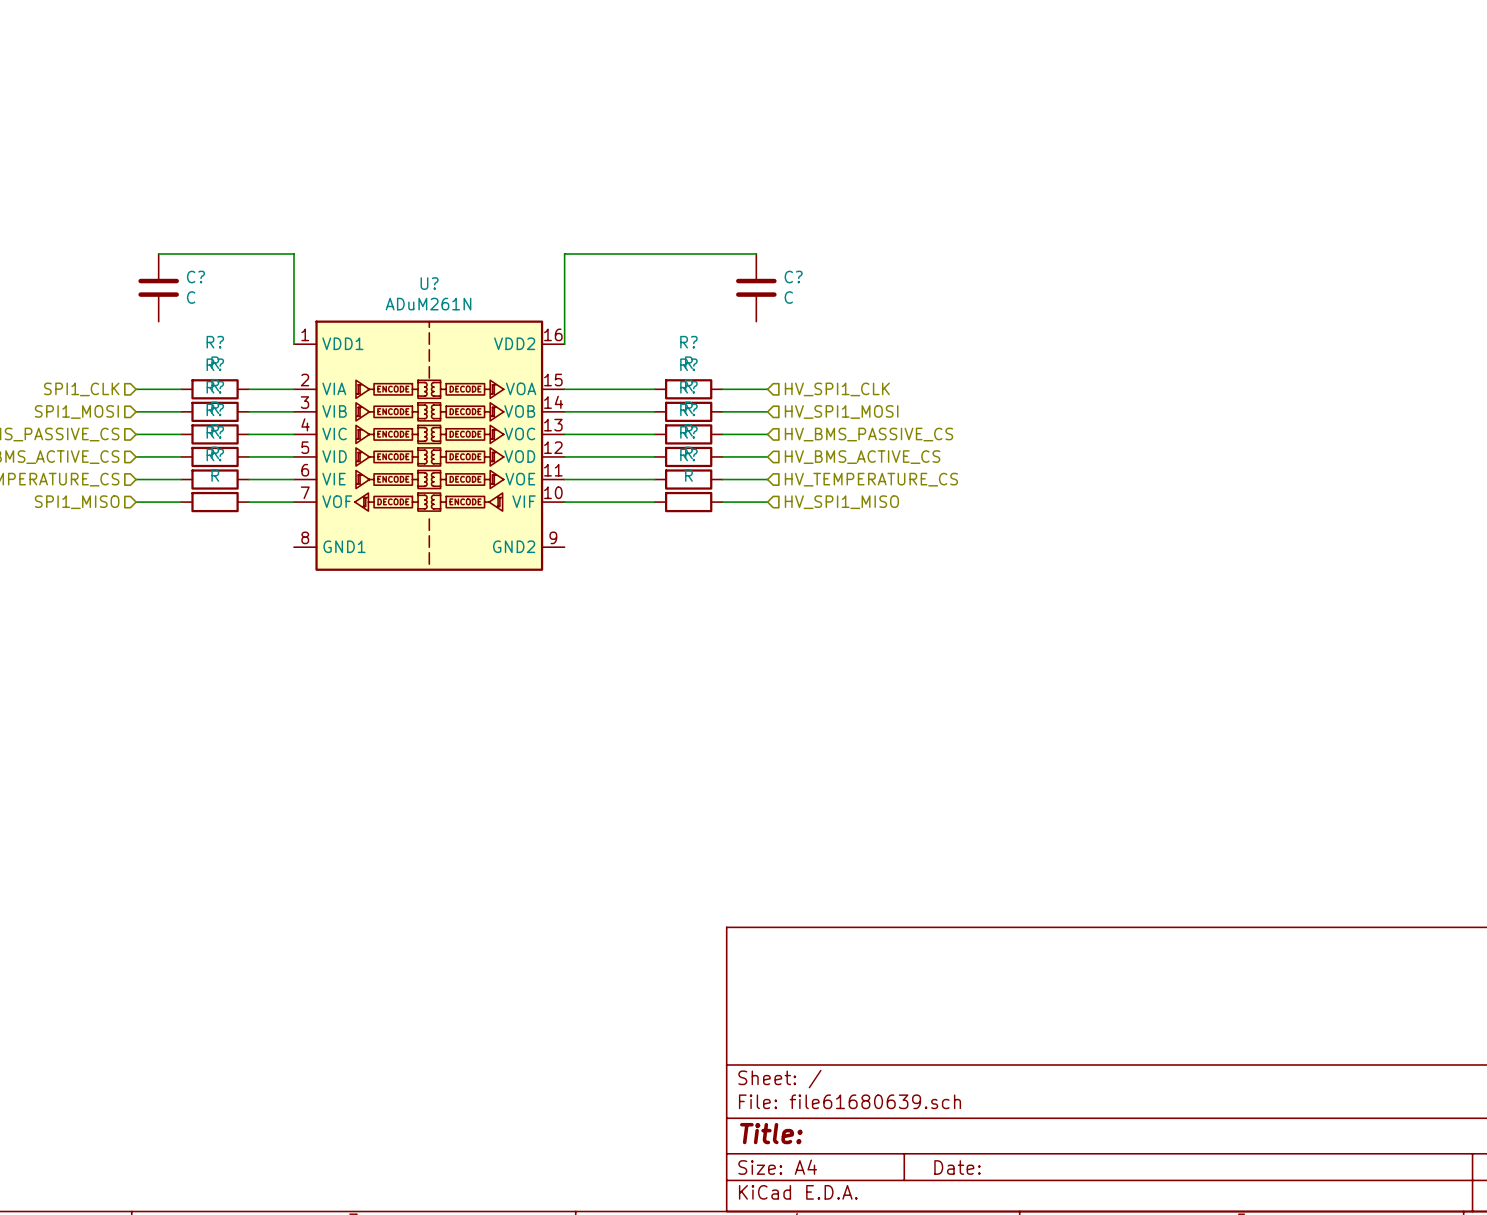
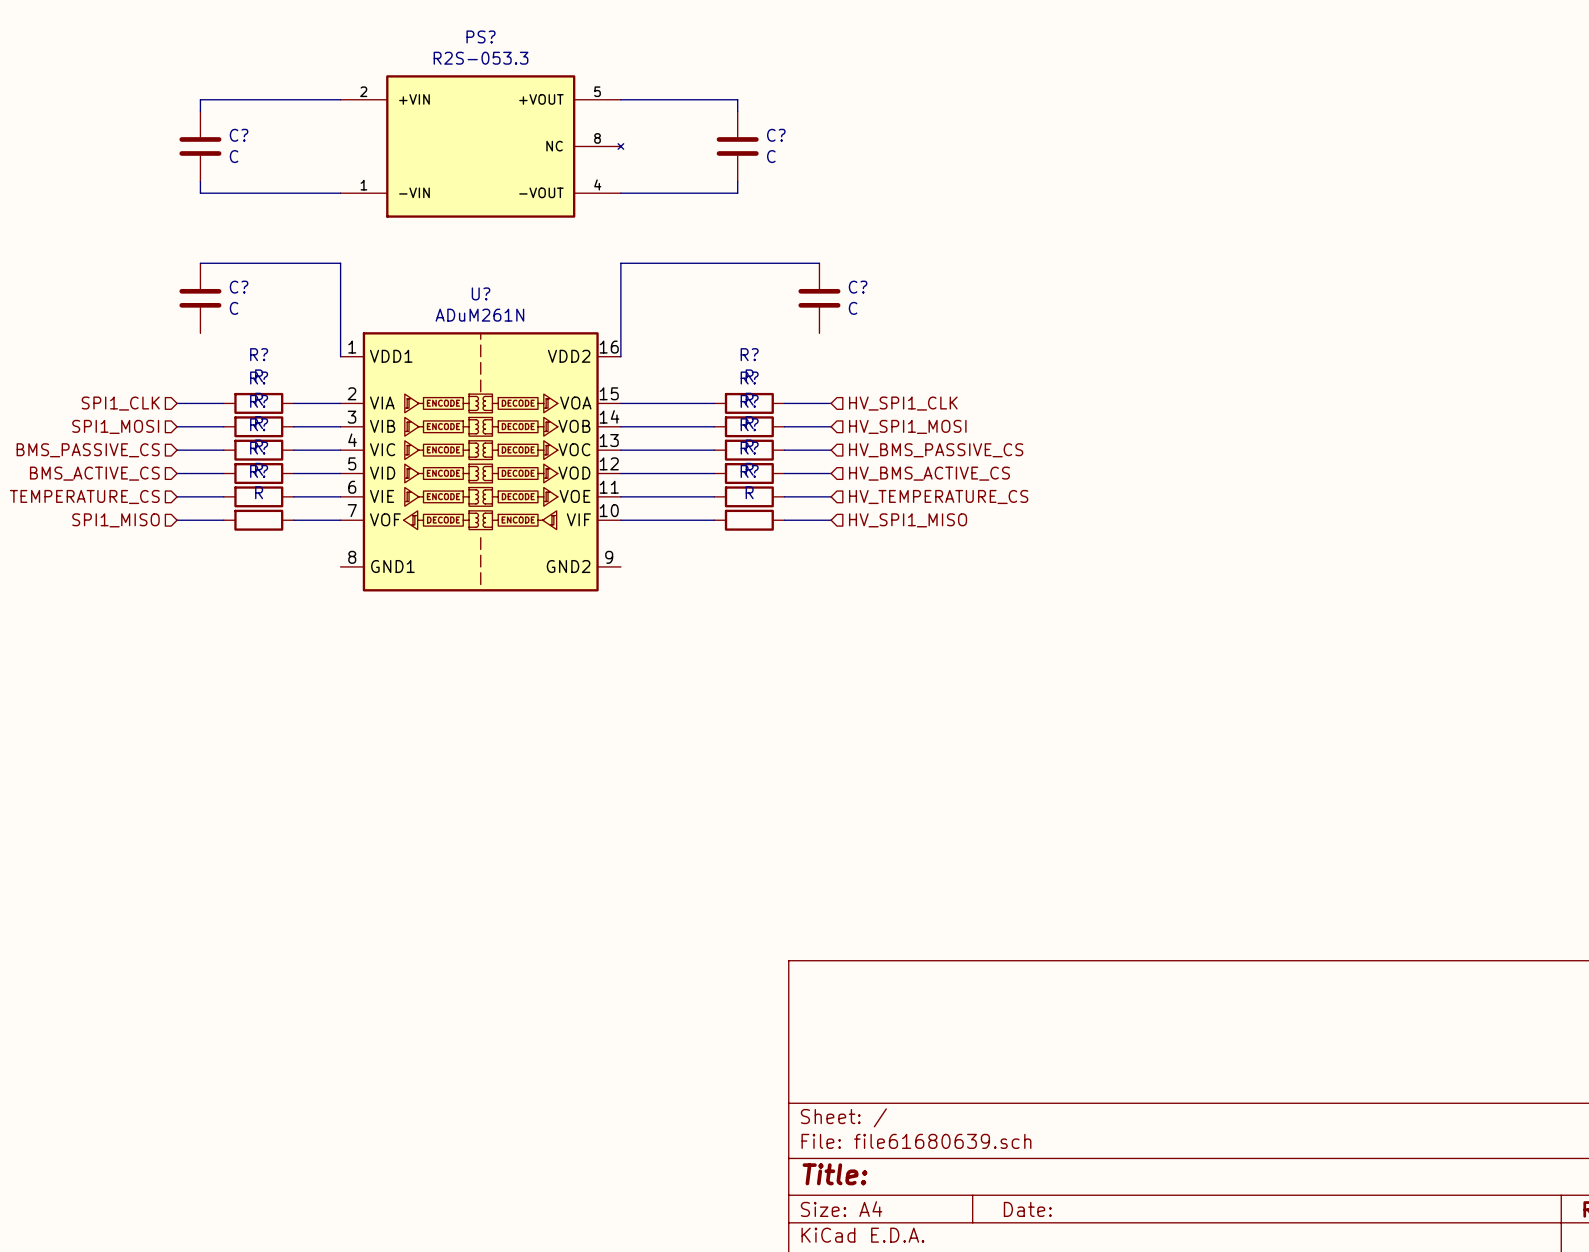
wire: none -> (340, 99) (200, 99) (200, 111)
wire: none -> (620, 99) (737, 99) (737, 111)
C?: none -> C (200, 146)
PS?: none -> R2S-053.3 (482, 146)
C?: none -> C (737, 146)
wire: none -> (200, 181) (200, 193) (340, 193)
wire: none -> (737, 181) (737, 193) (620, 193)

